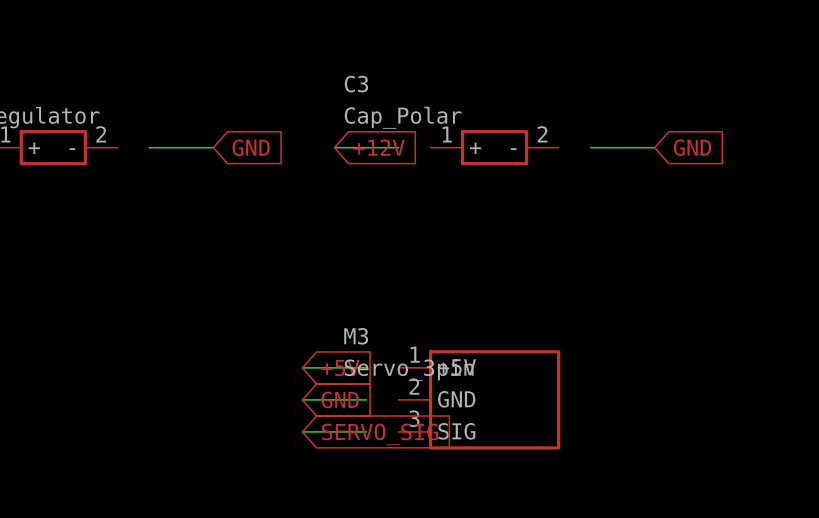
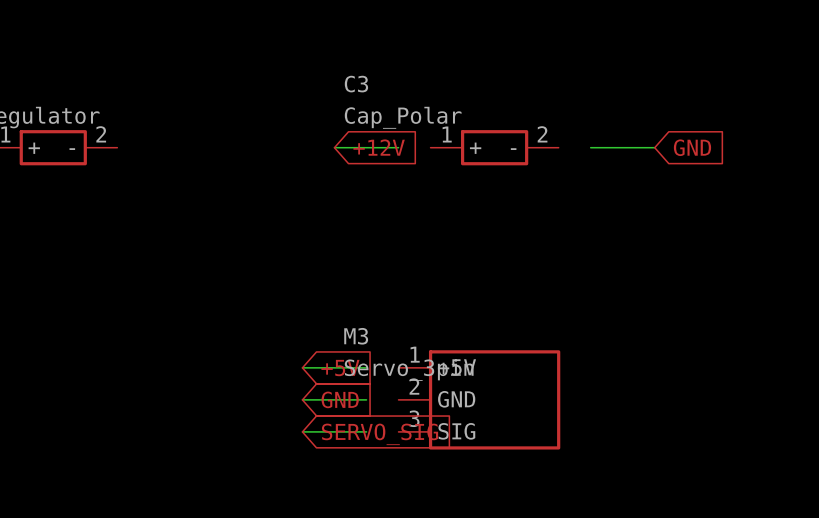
wire: (149, 147) (213, 147) -> none
global label: GND (251, 147) -> none

